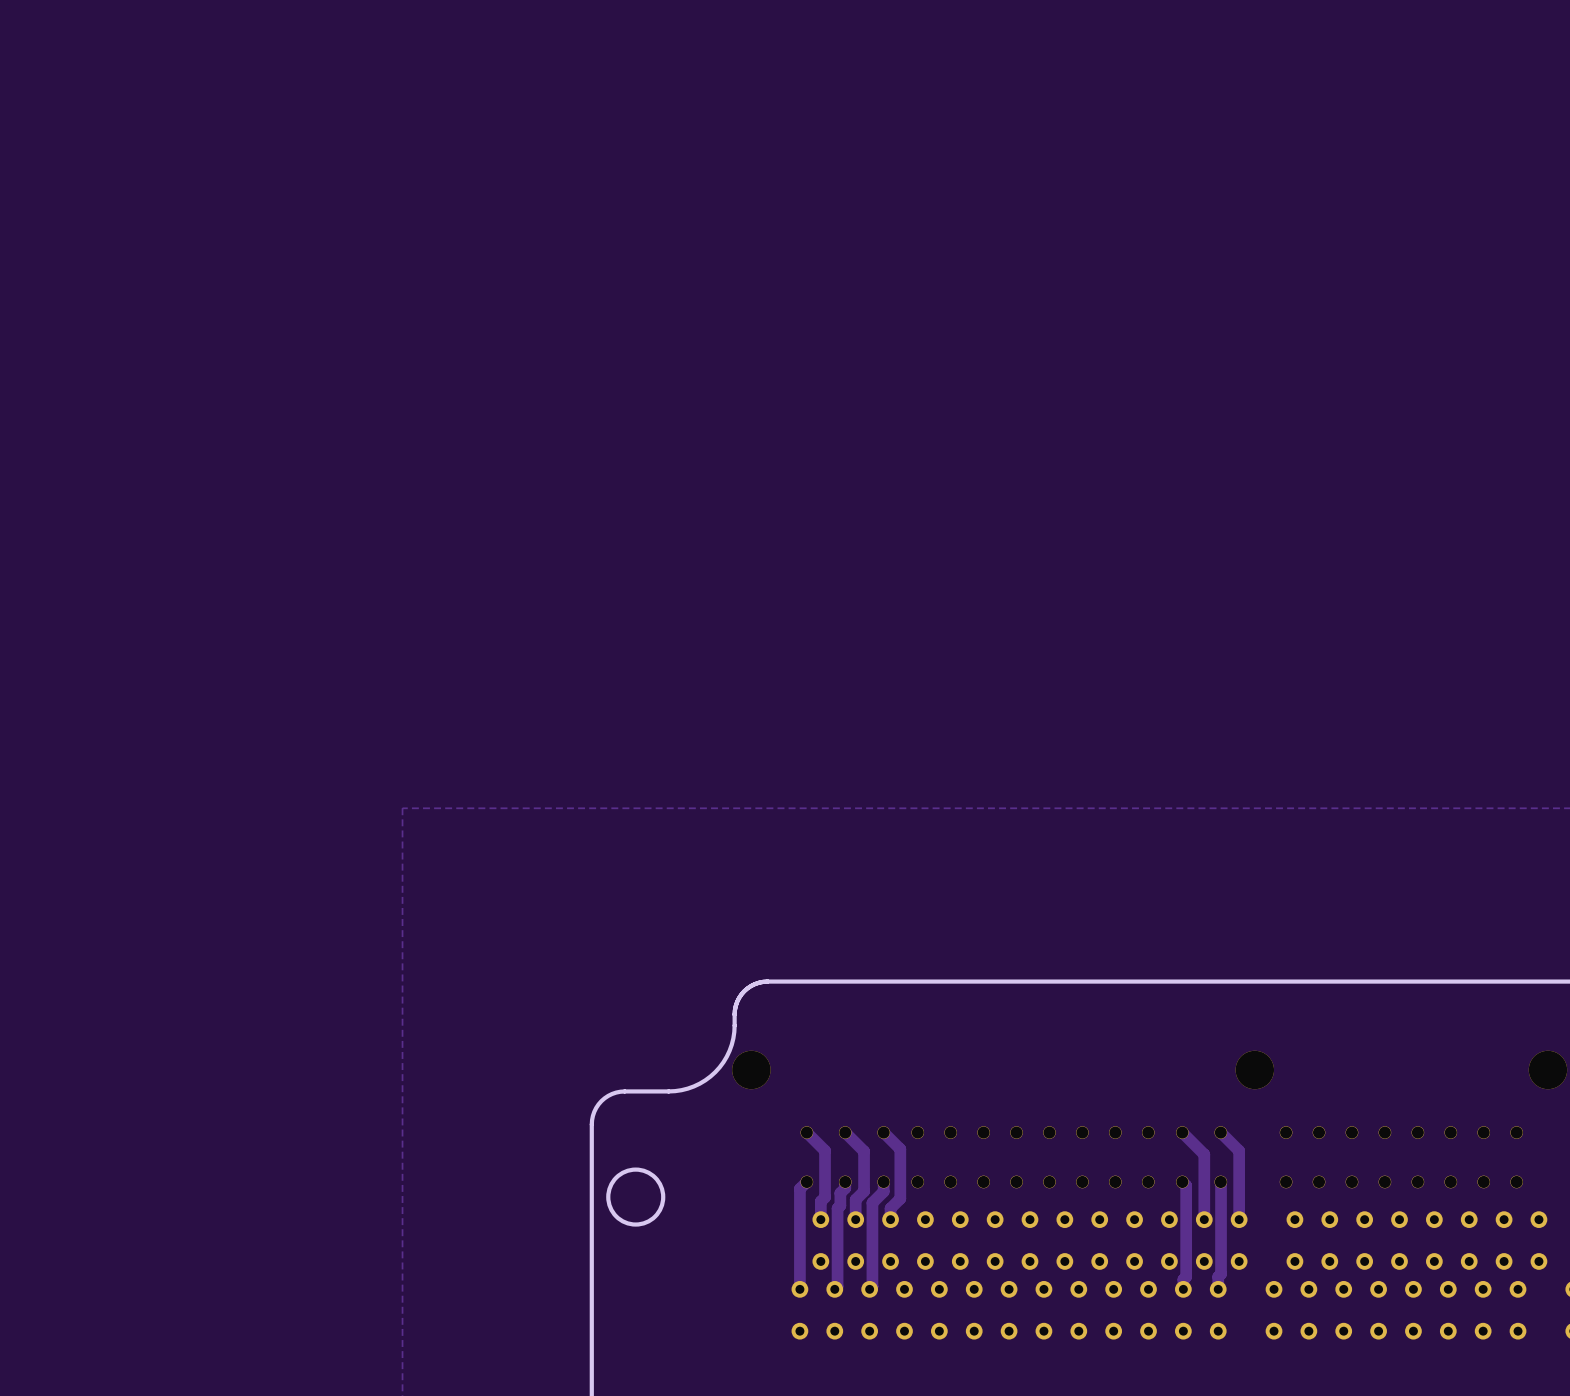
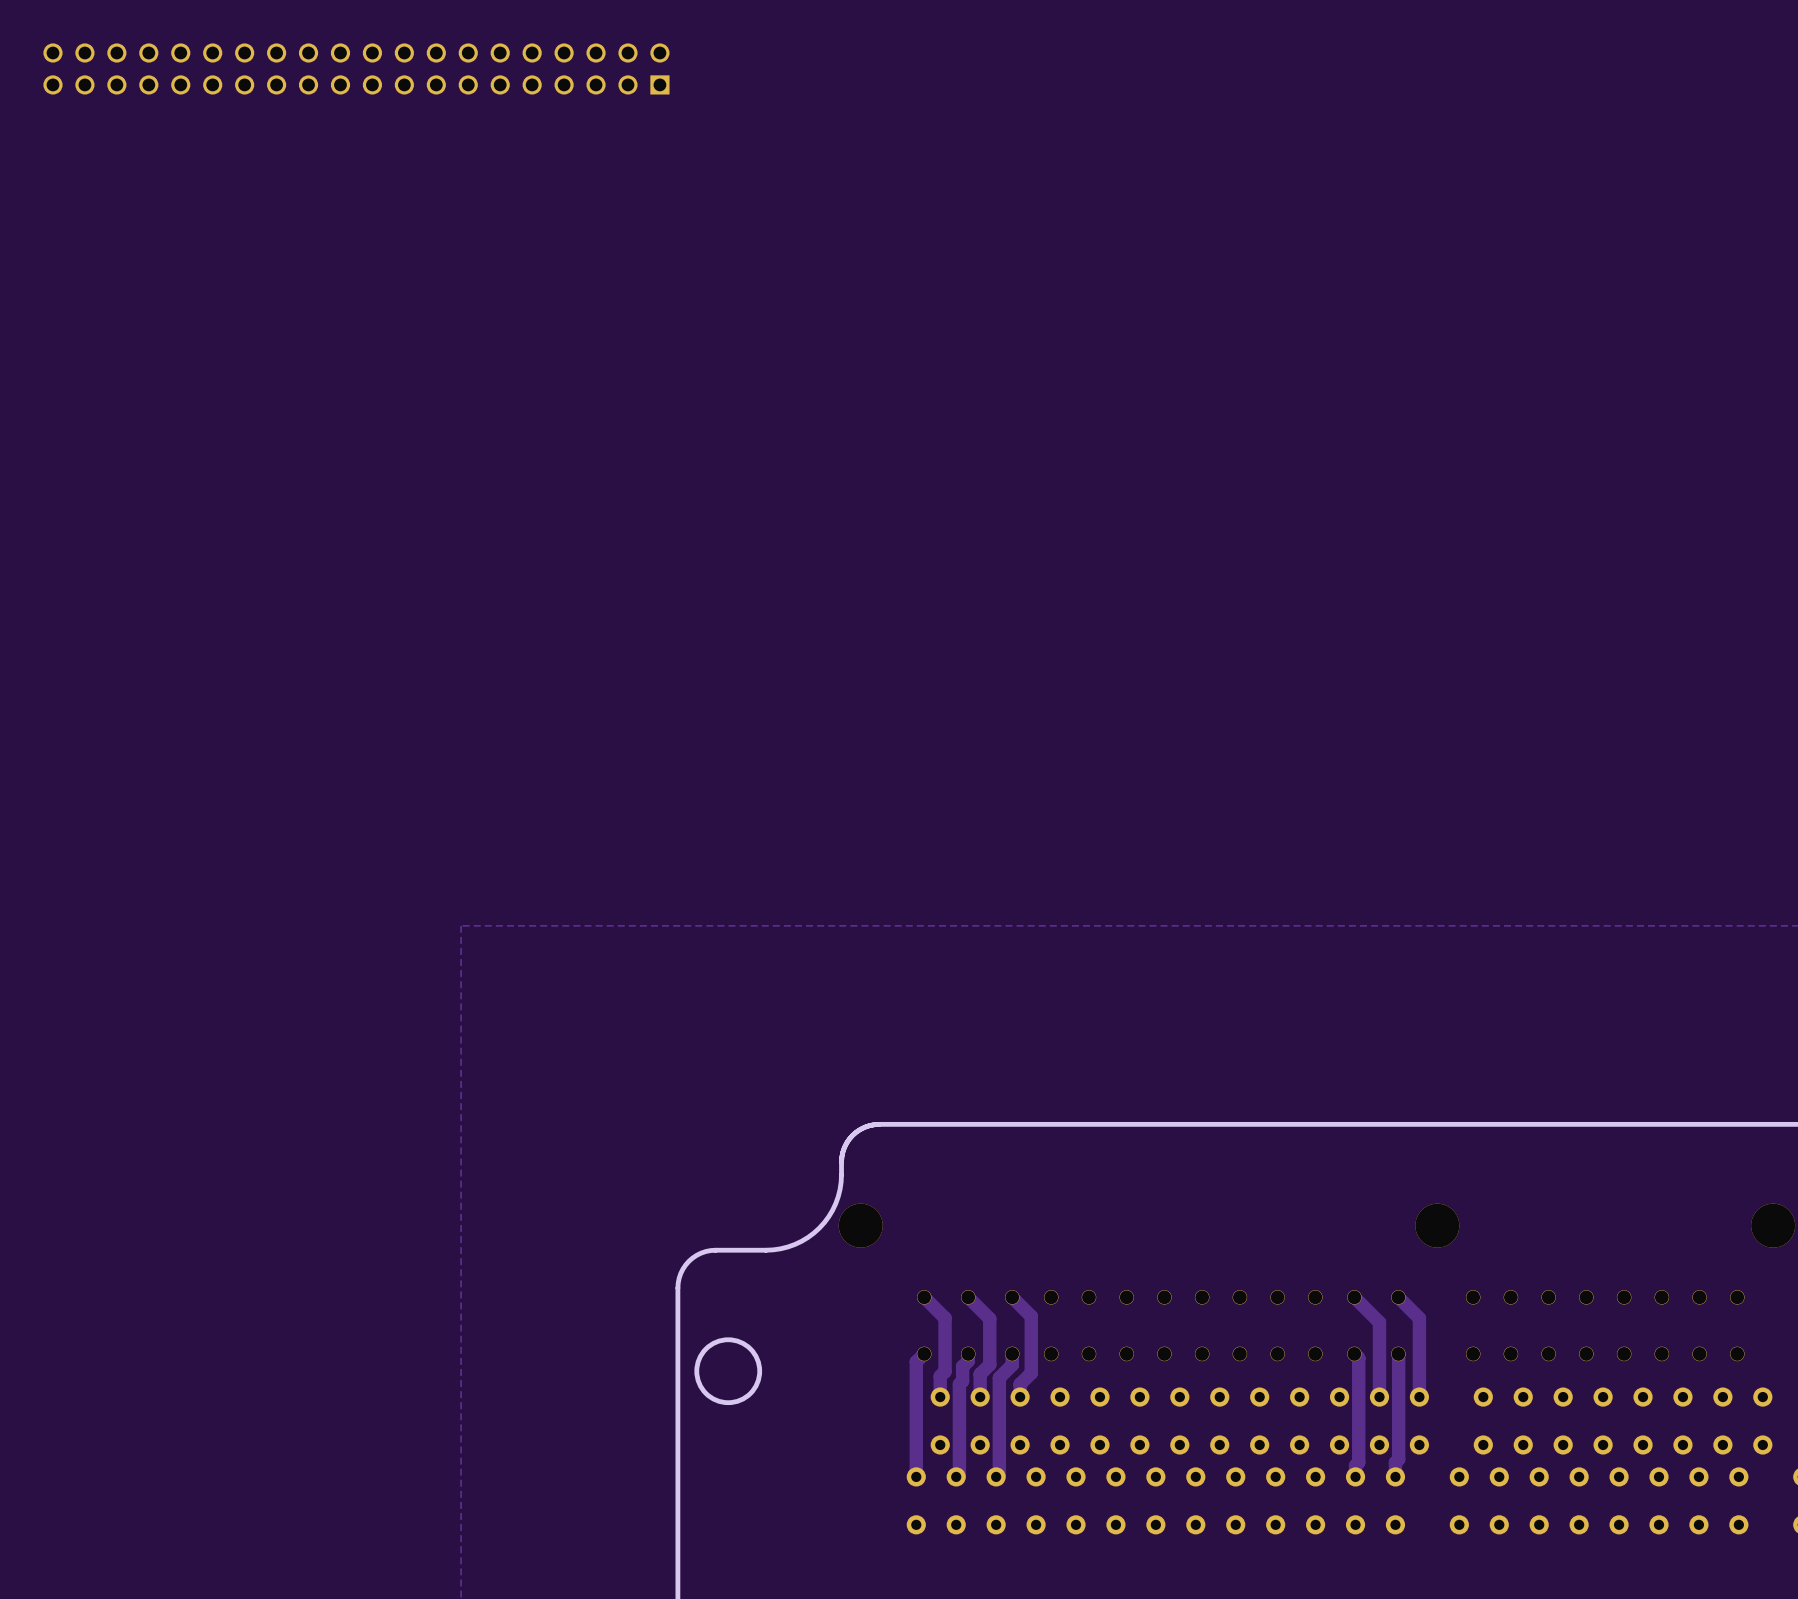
part: none -> (356, 68)

